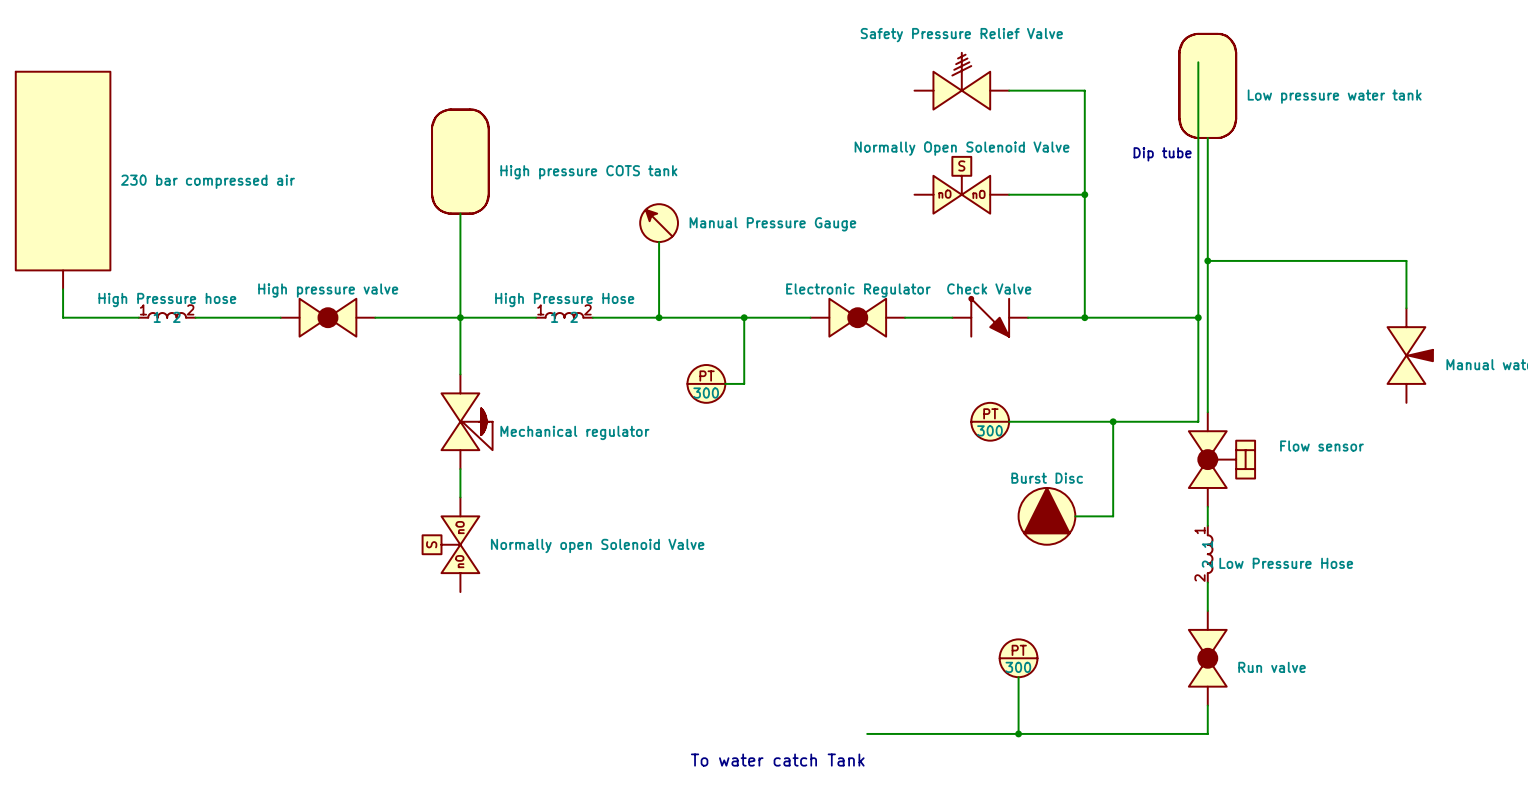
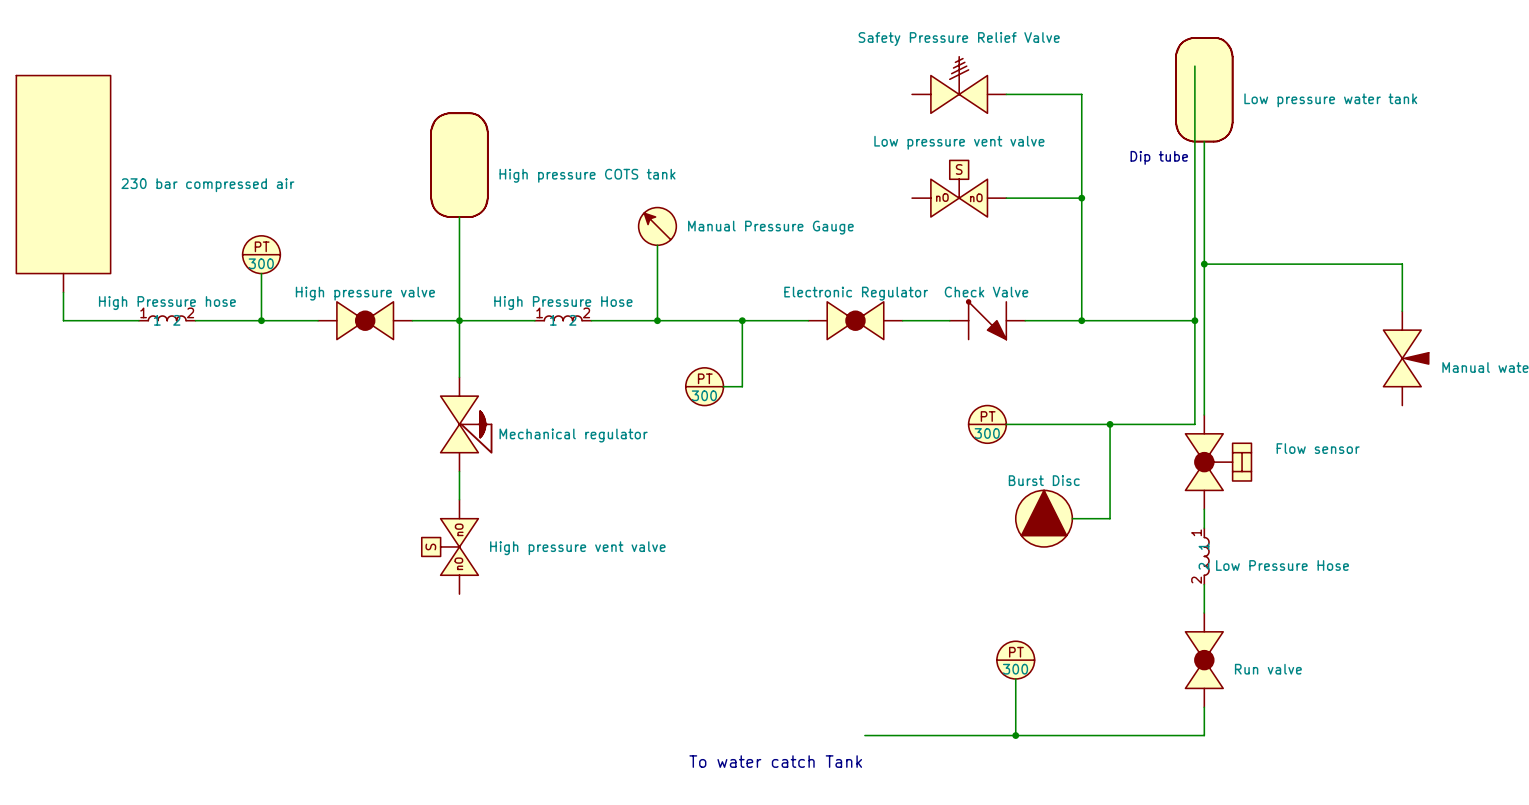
part value: Normally Open Solenoid Valve (962, 148) -> Low pressure vent valve (959, 142)
part: none -> 300 (261, 254)
wire: none -> (261, 273) (261, 320)
junction: none -> (261, 320)
part position: (327, 317) -> (365, 320)
part value: Normally open Solenoid Valve (597, 545) -> High pressure vent valve (577, 548)

